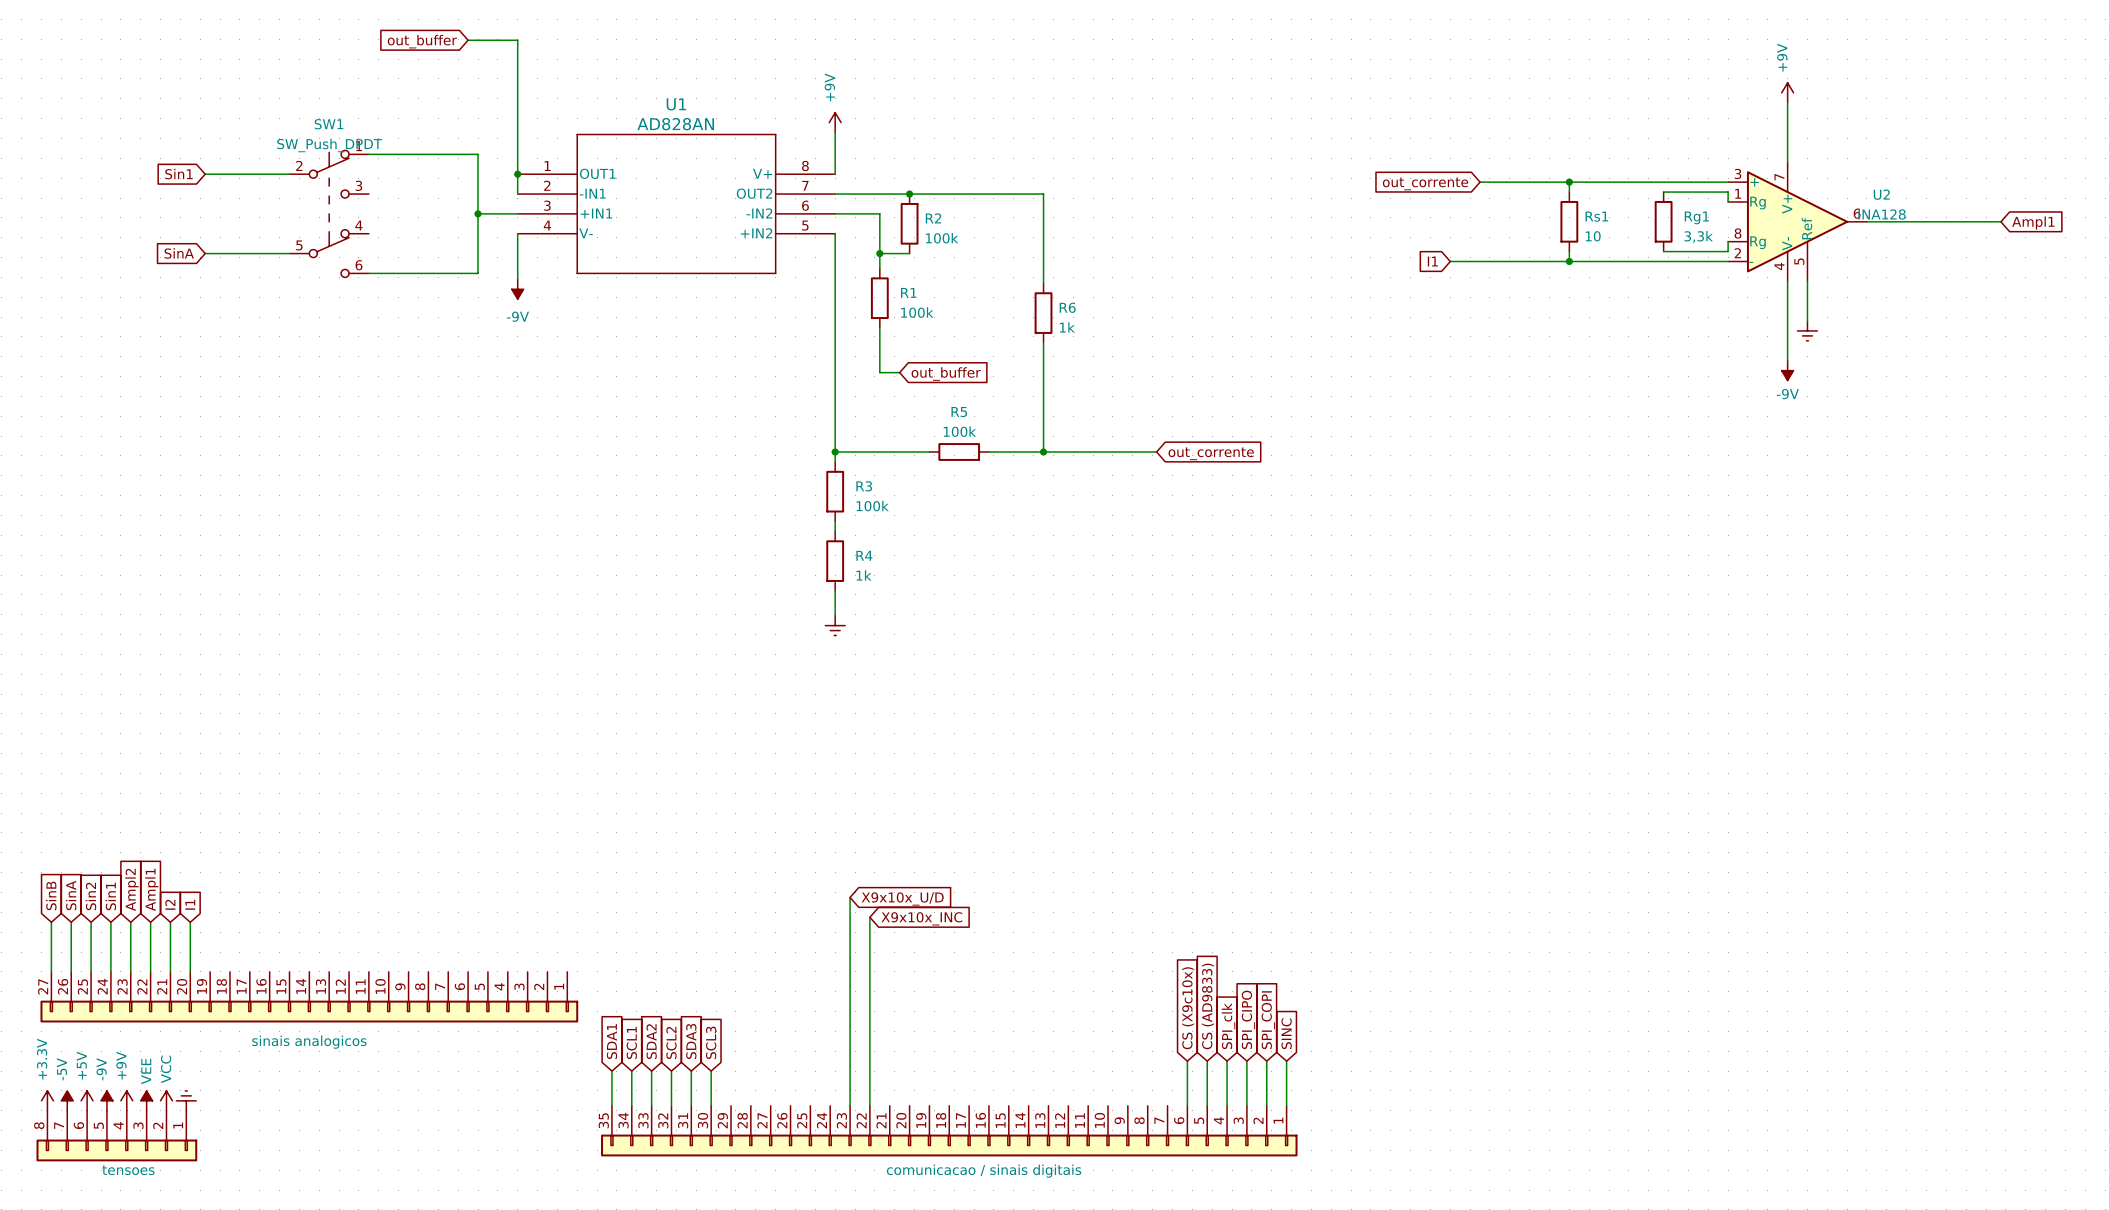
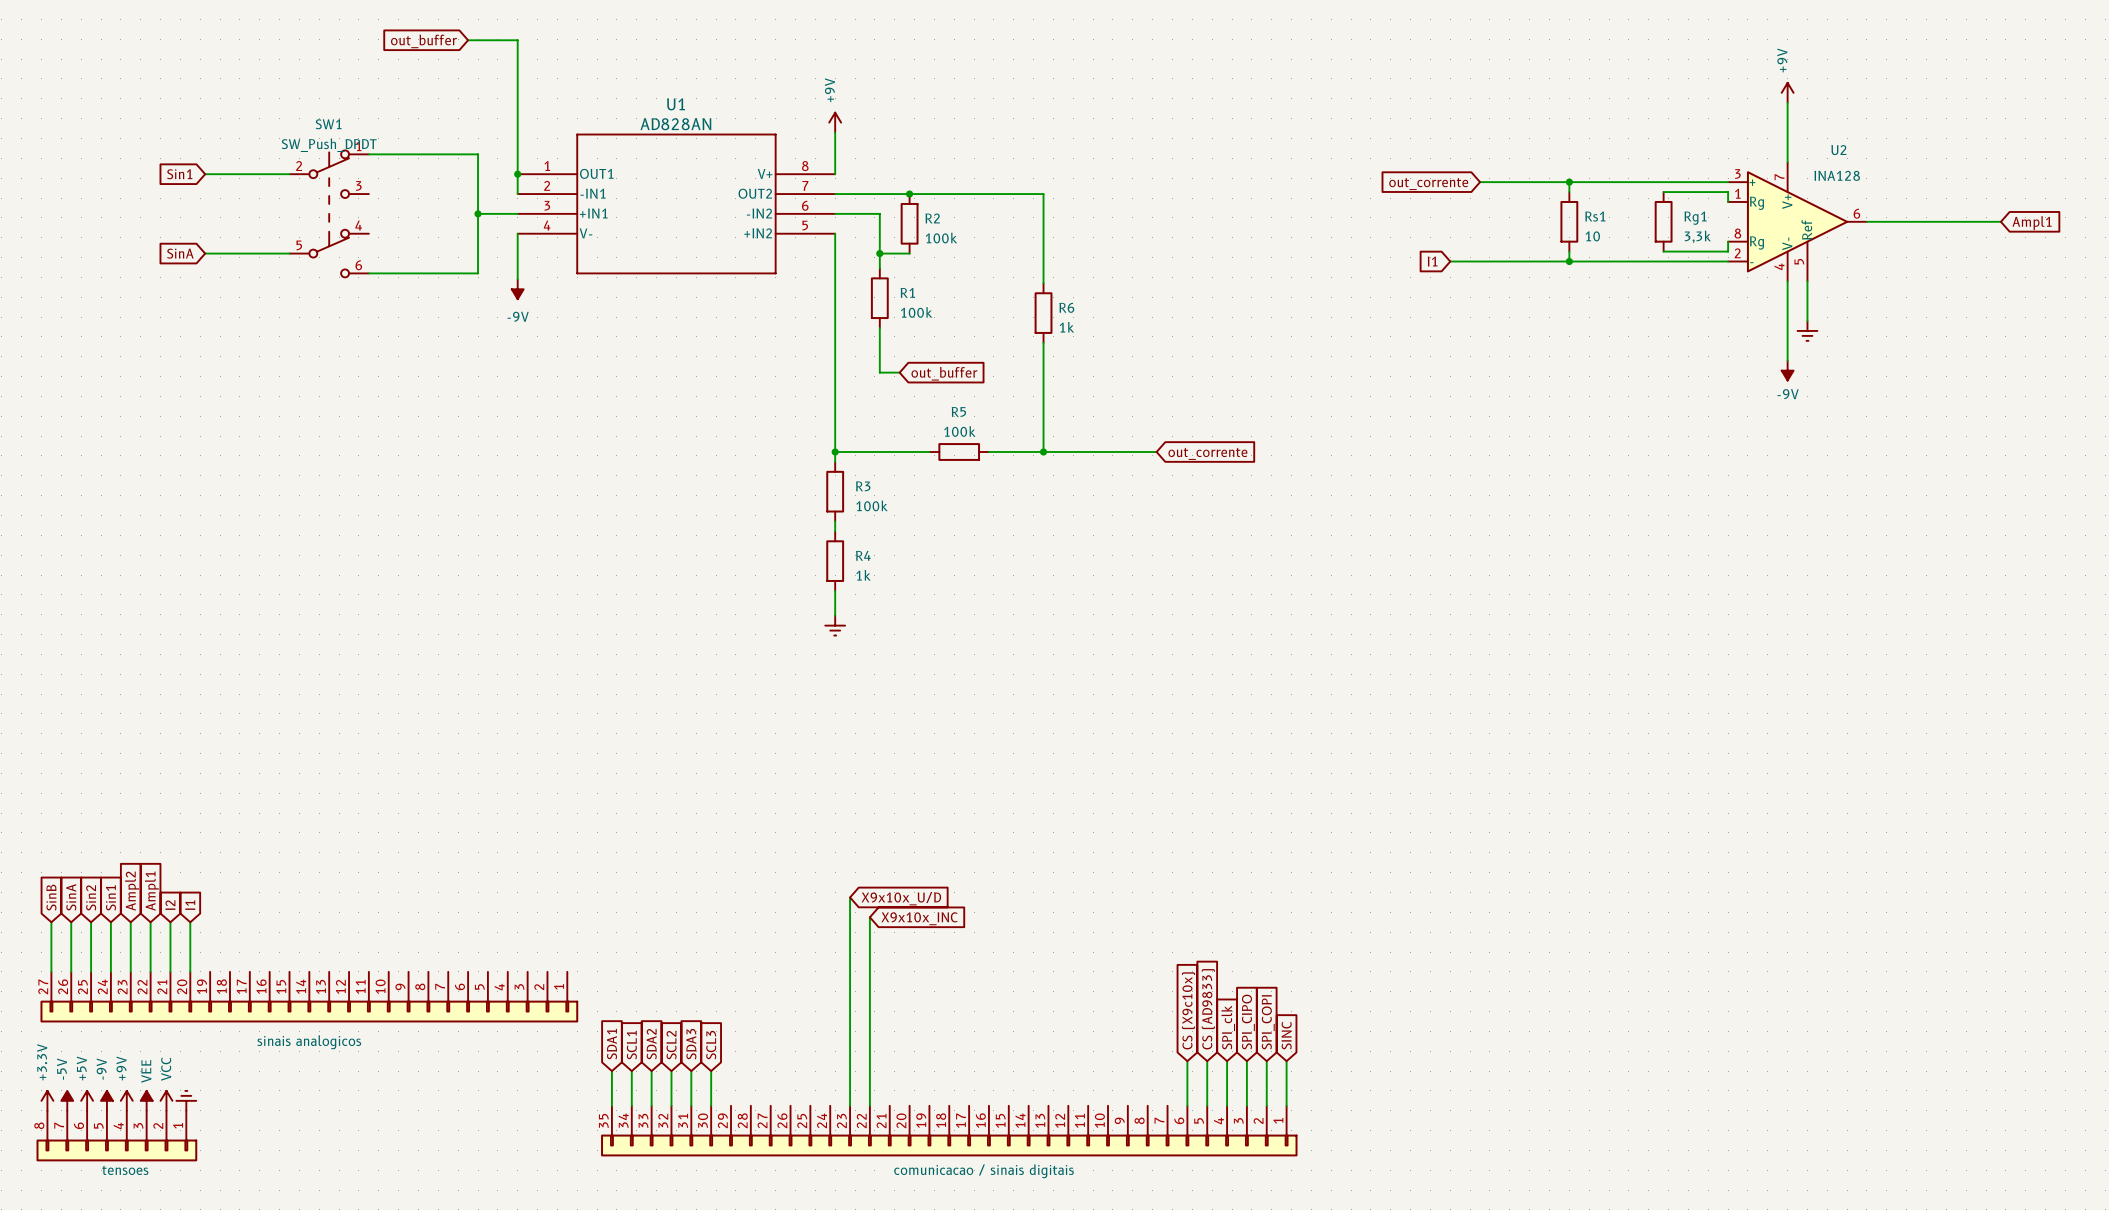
U2 name position: U2 (1881, 194) -> U2 (1838, 150)
U2 value position: INA128 (1882, 214) -> INA128 (1837, 175)

